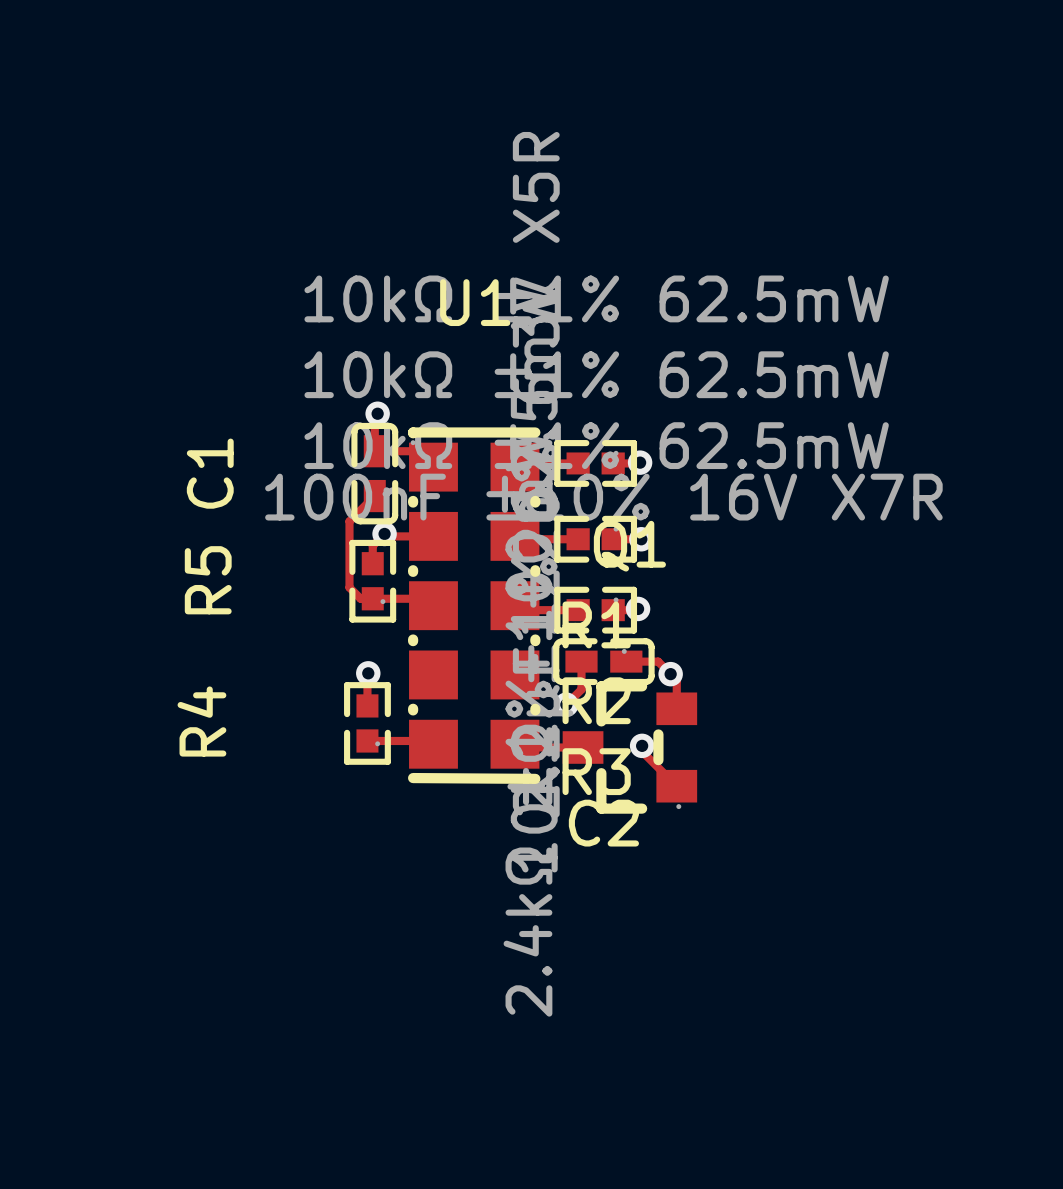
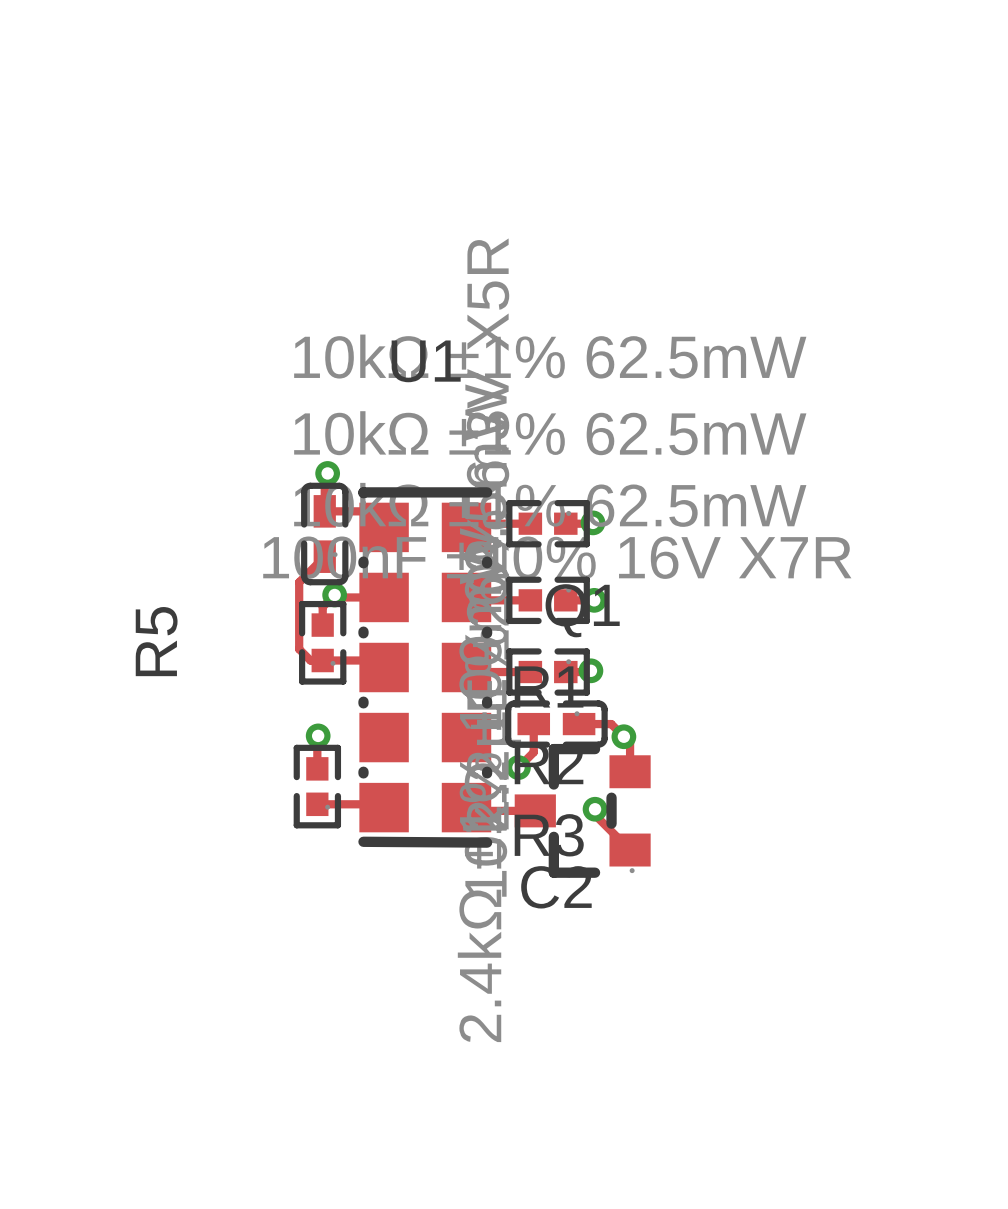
C1 name: C1 (210, 473) -> none
R4 name: R4 (201, 721) -> none

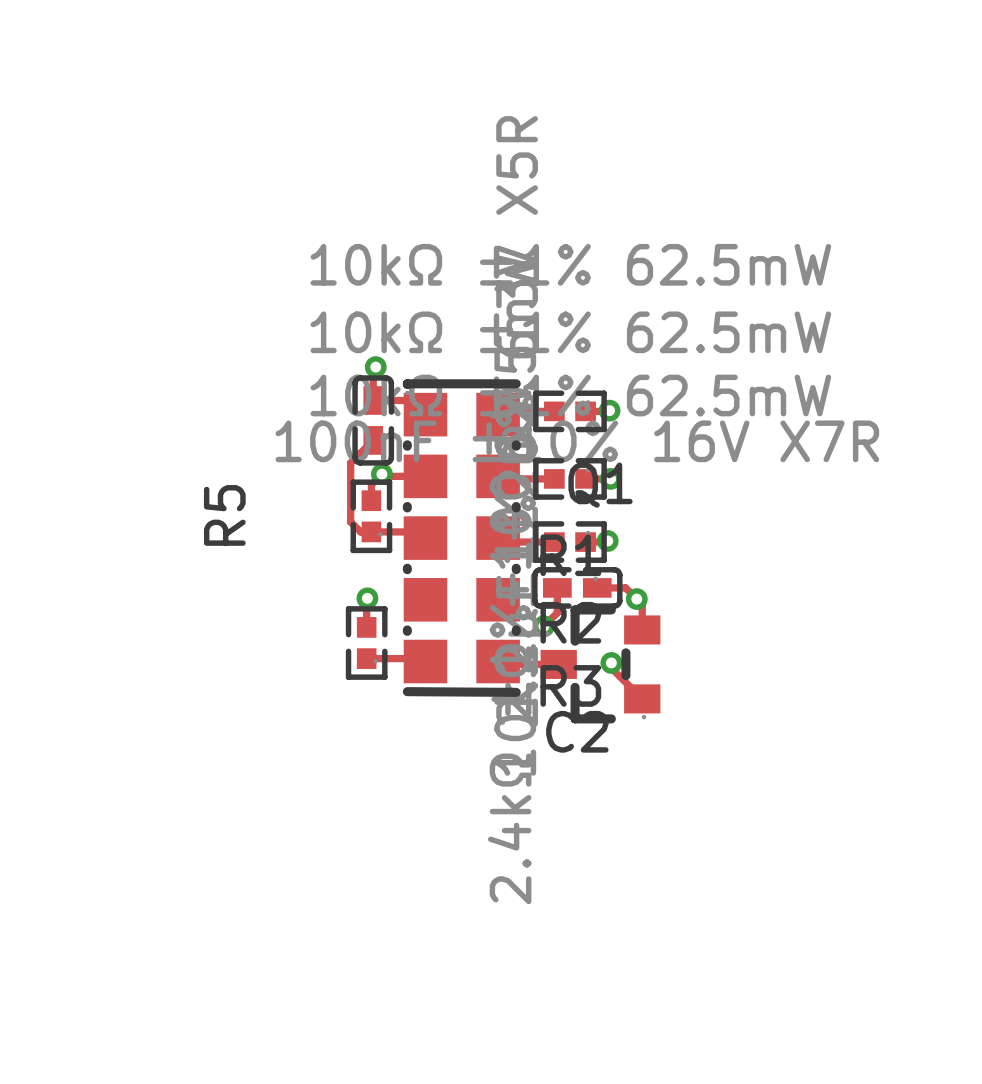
U1 name: U1 (426, 361) -> none

